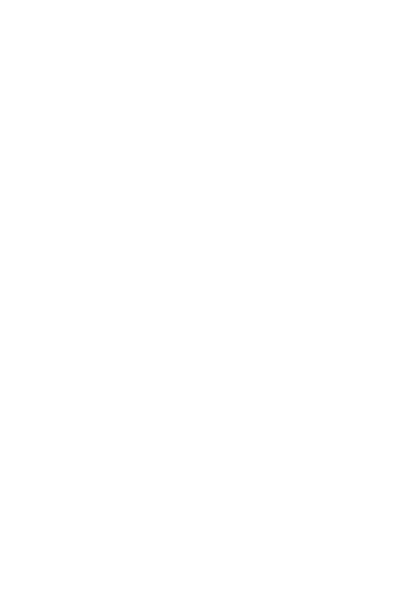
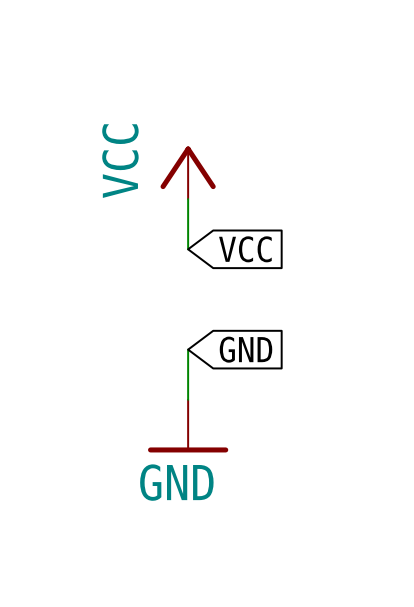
power symbol: none -> VCC (188, 172)
wire: none -> (188, 199) (188, 249)
global label: none -> VCC (245, 249)
wire: none -> (188, 349) (188, 399)
global label: none -> GND (245, 349)
power symbol: none -> GND (188, 426)

